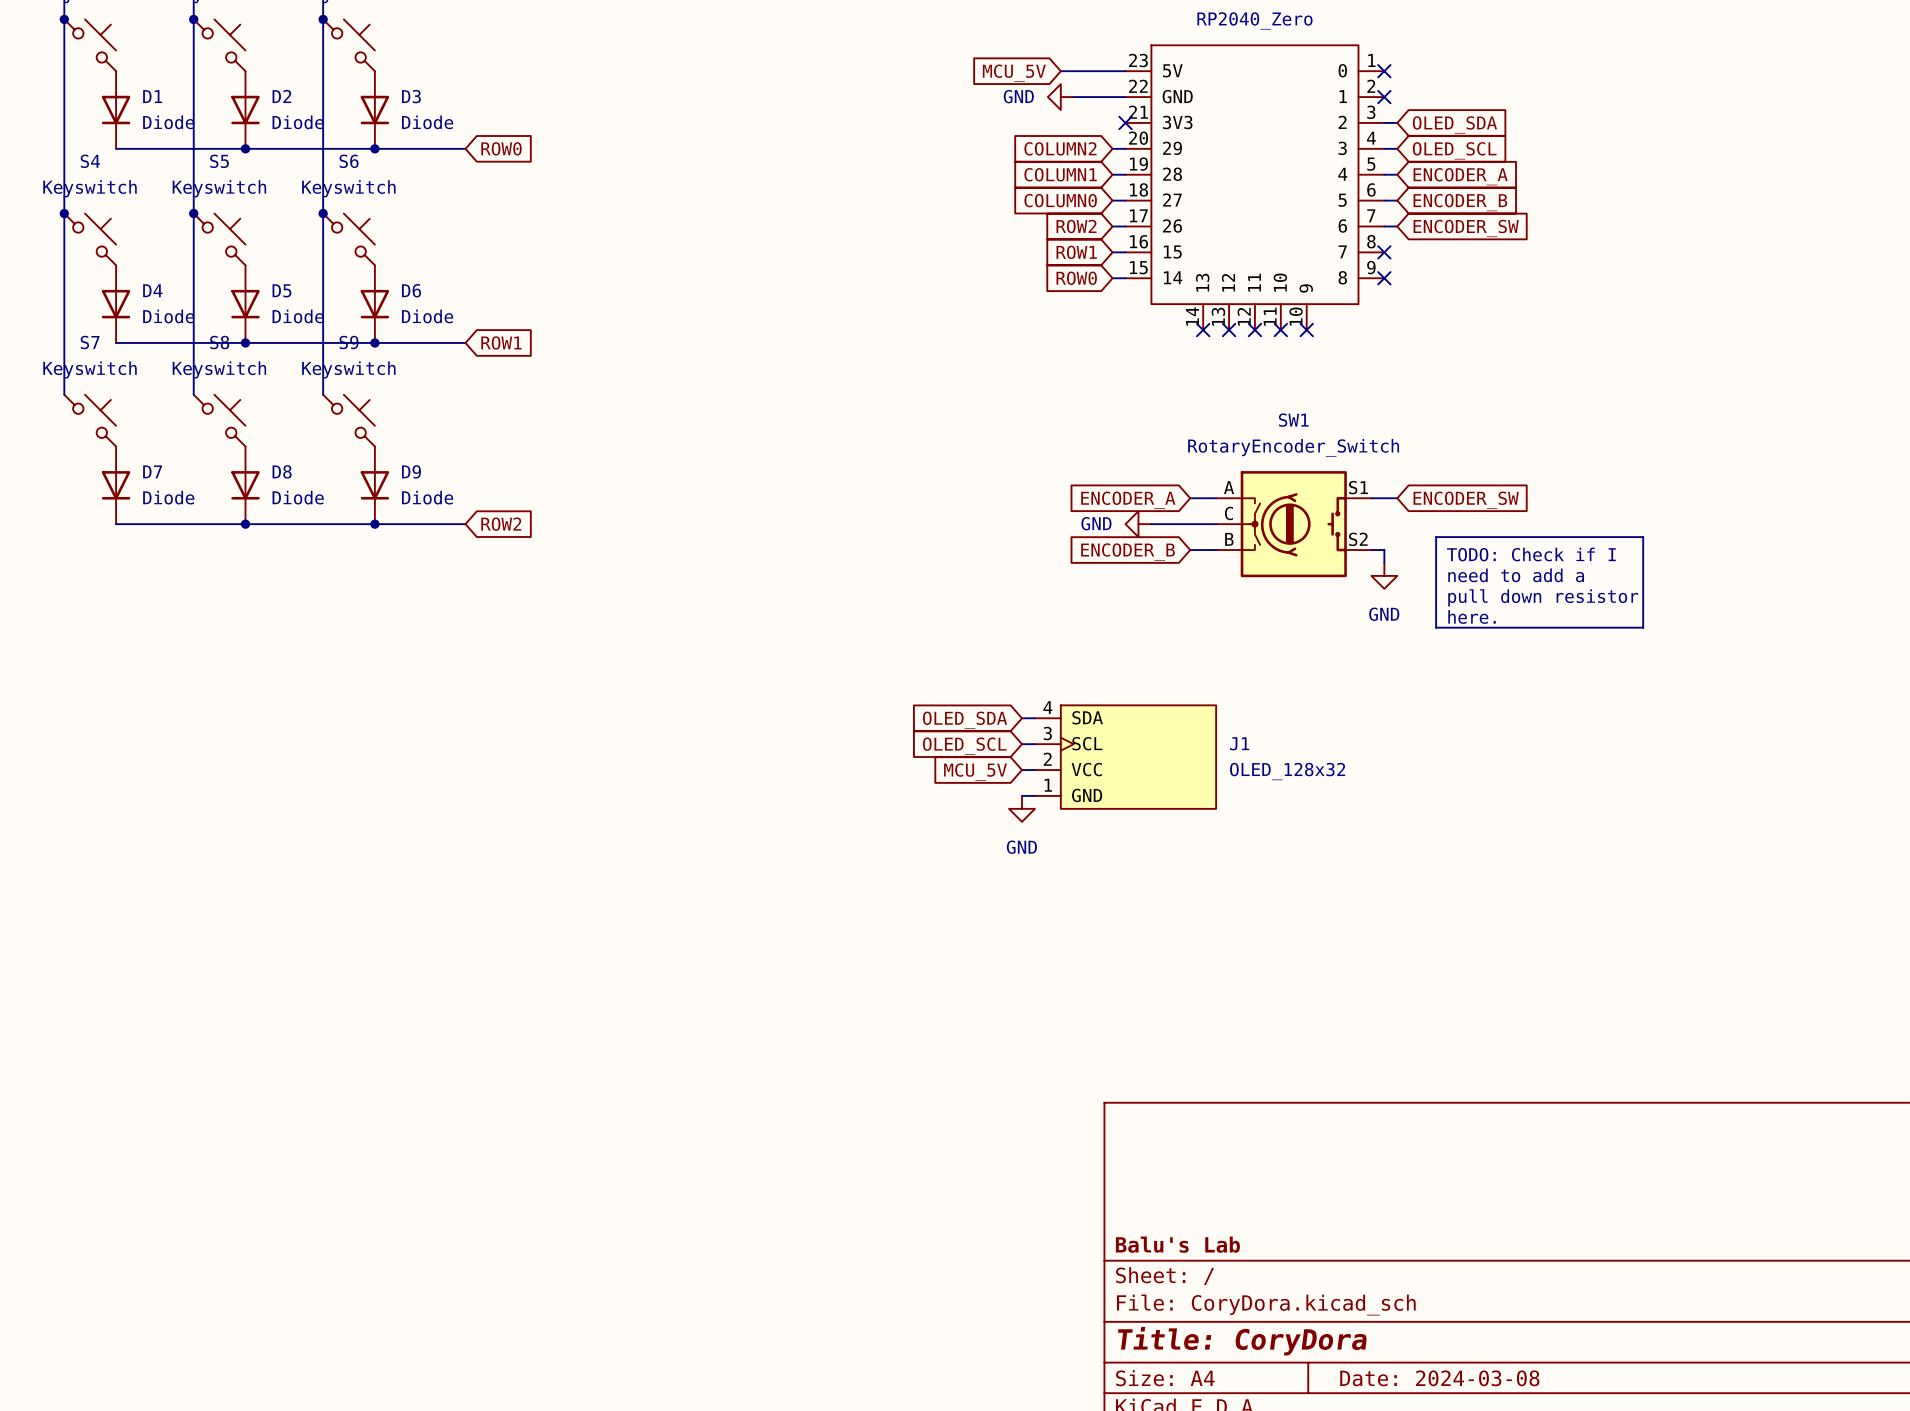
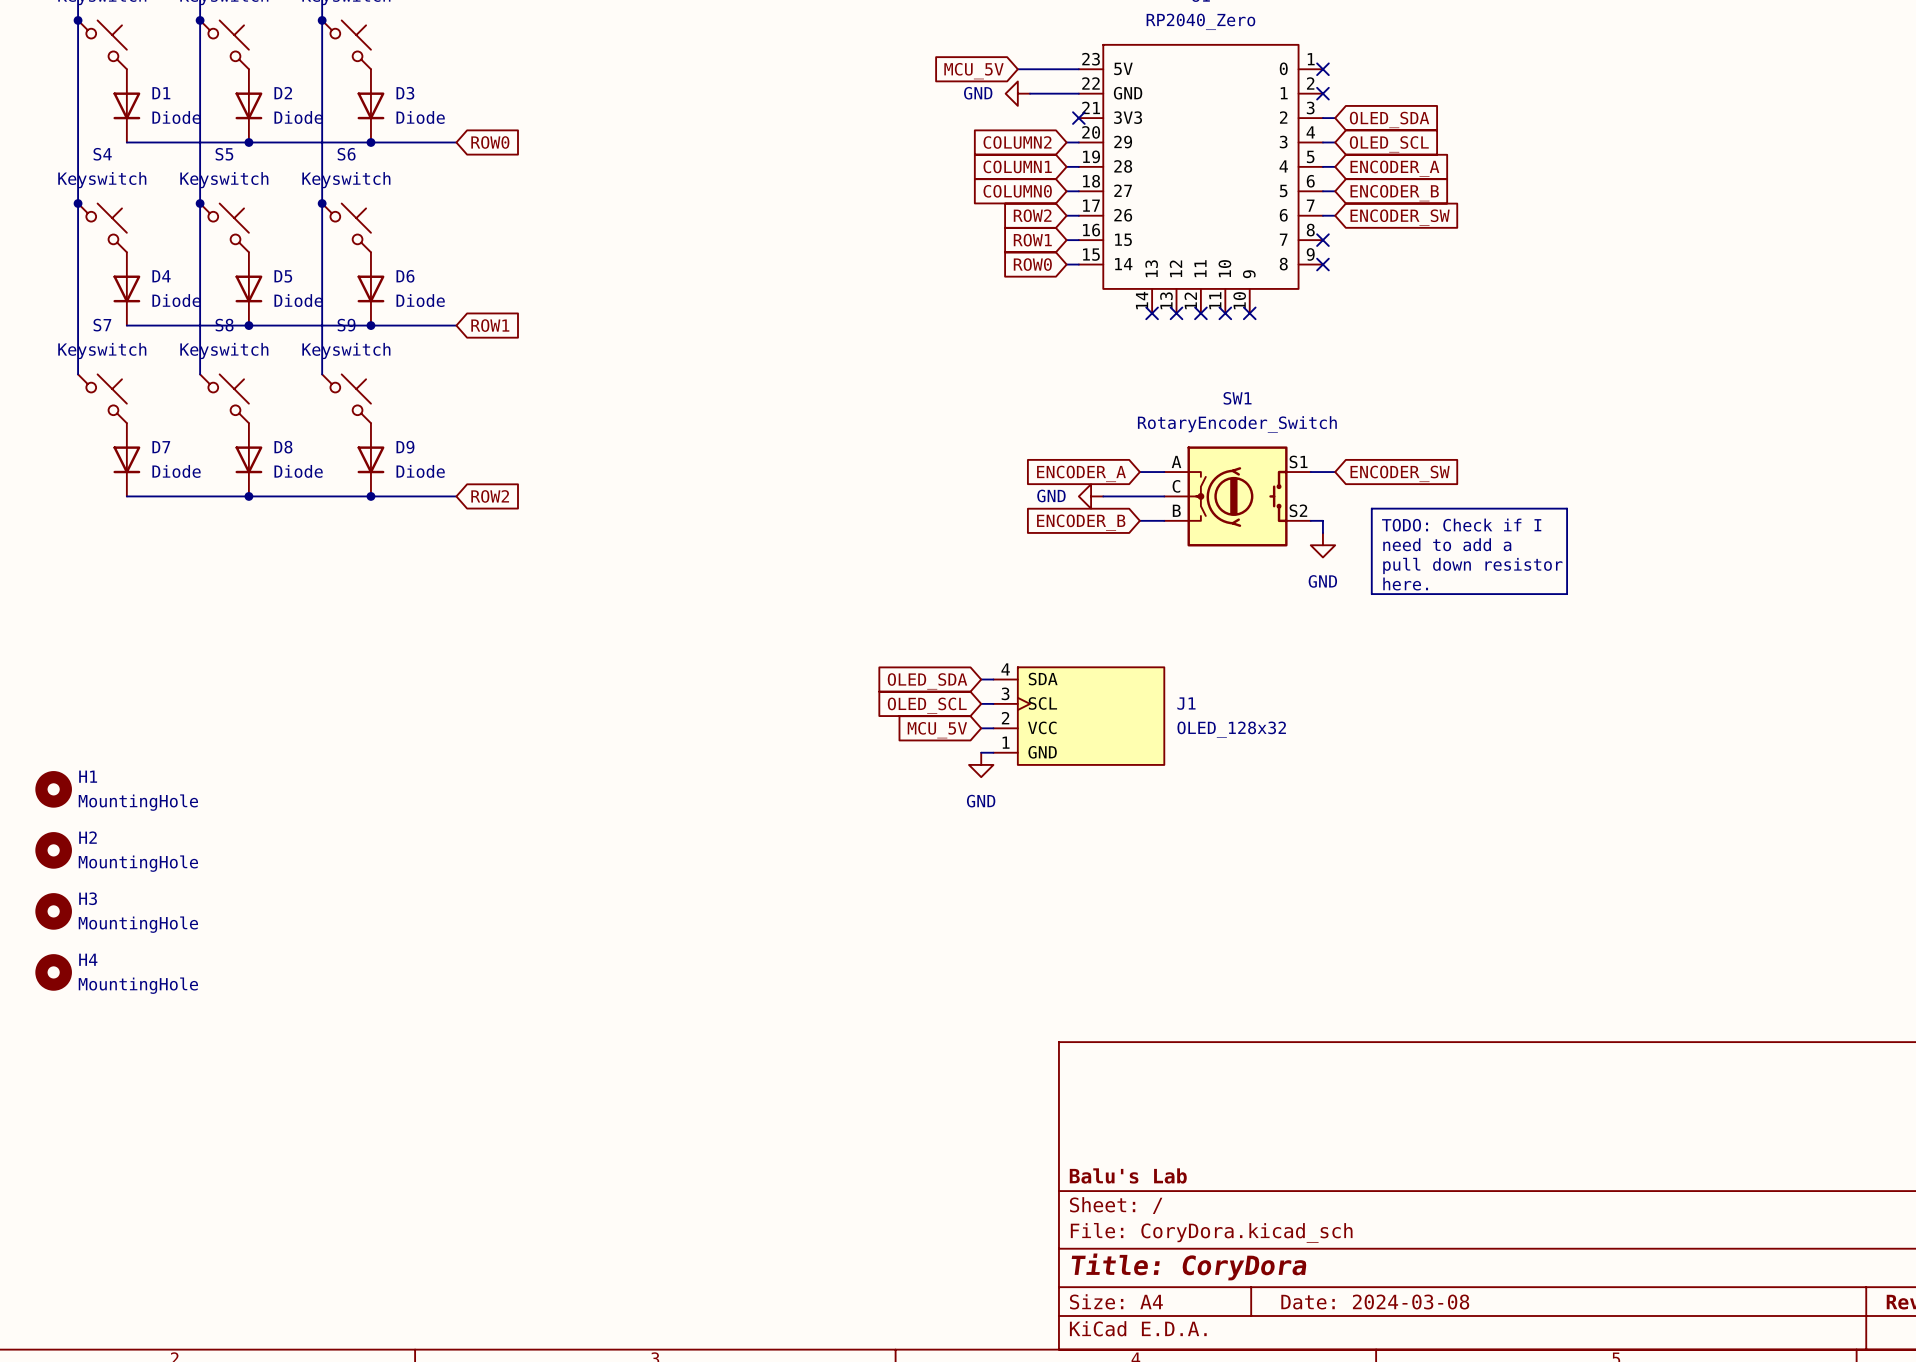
H1: none -> MountingHole (53, 789)
H2: none -> MountingHole (53, 850)
H3: none -> MountingHole (53, 911)
H4: none -> MountingHole (53, 972)

